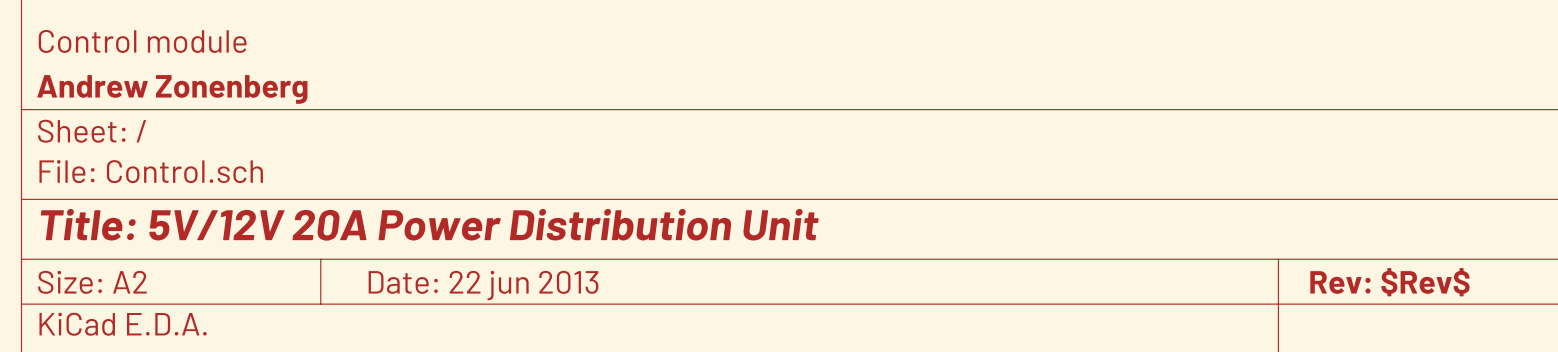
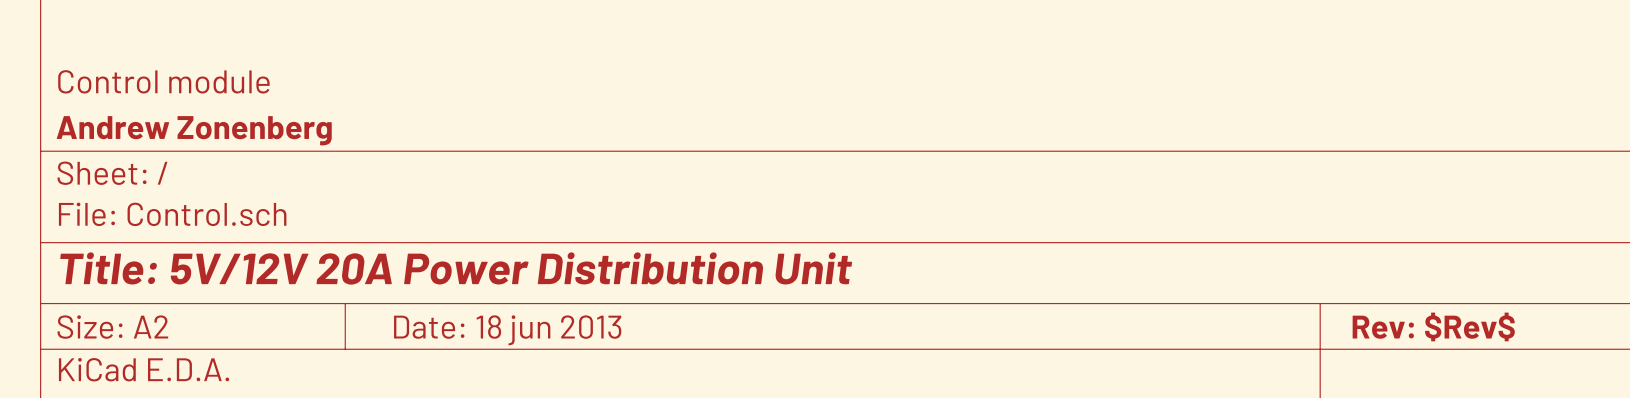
title block: Date: 22 jun 2013 (483, 285) -> Date: 18 jun 2013 (507, 330)

